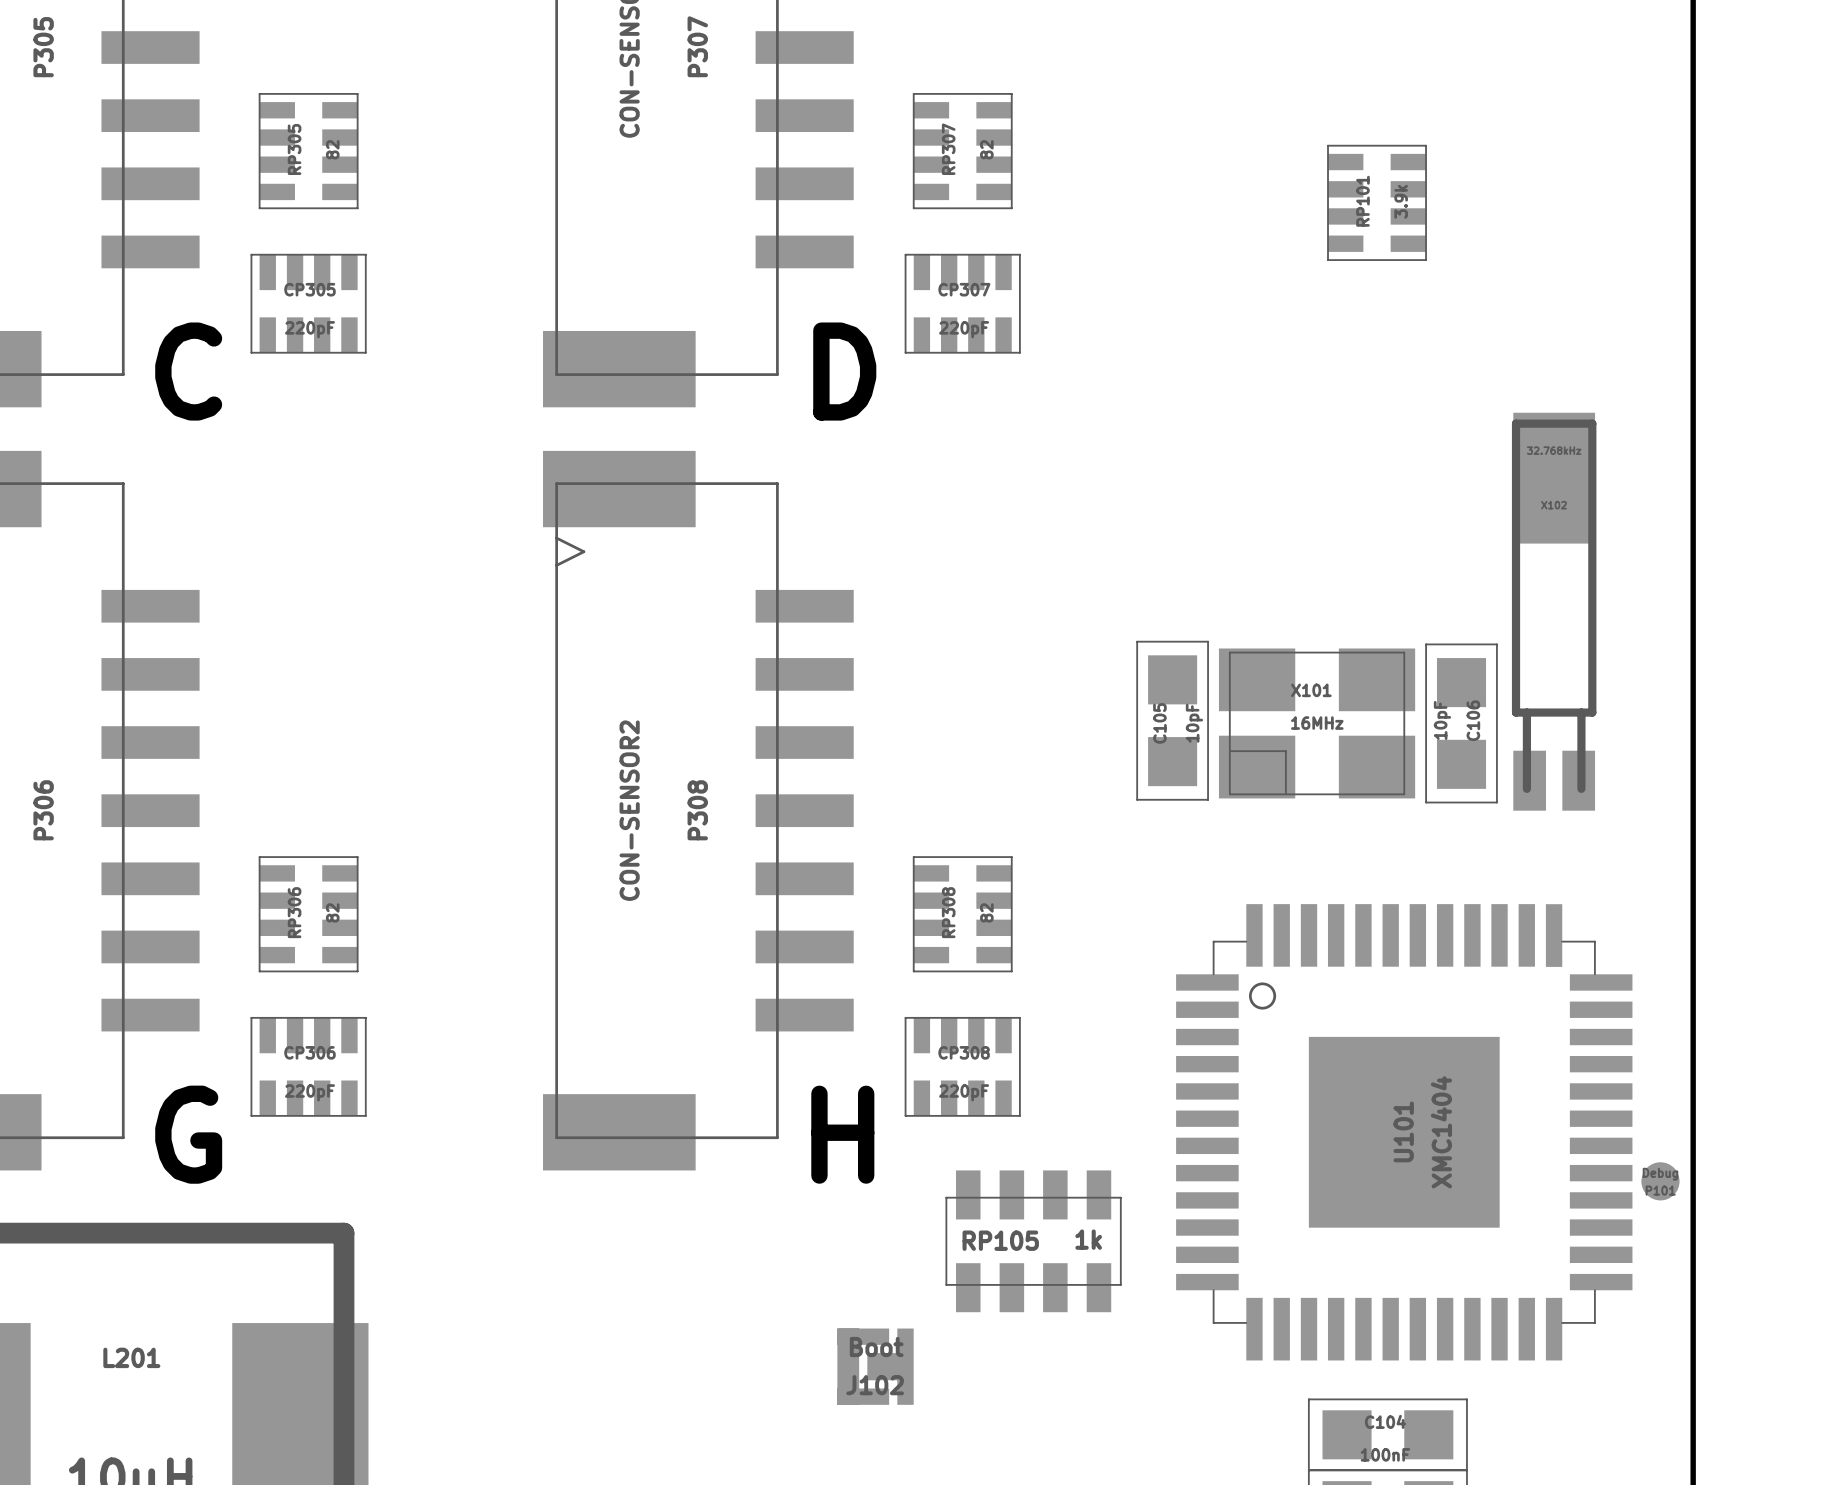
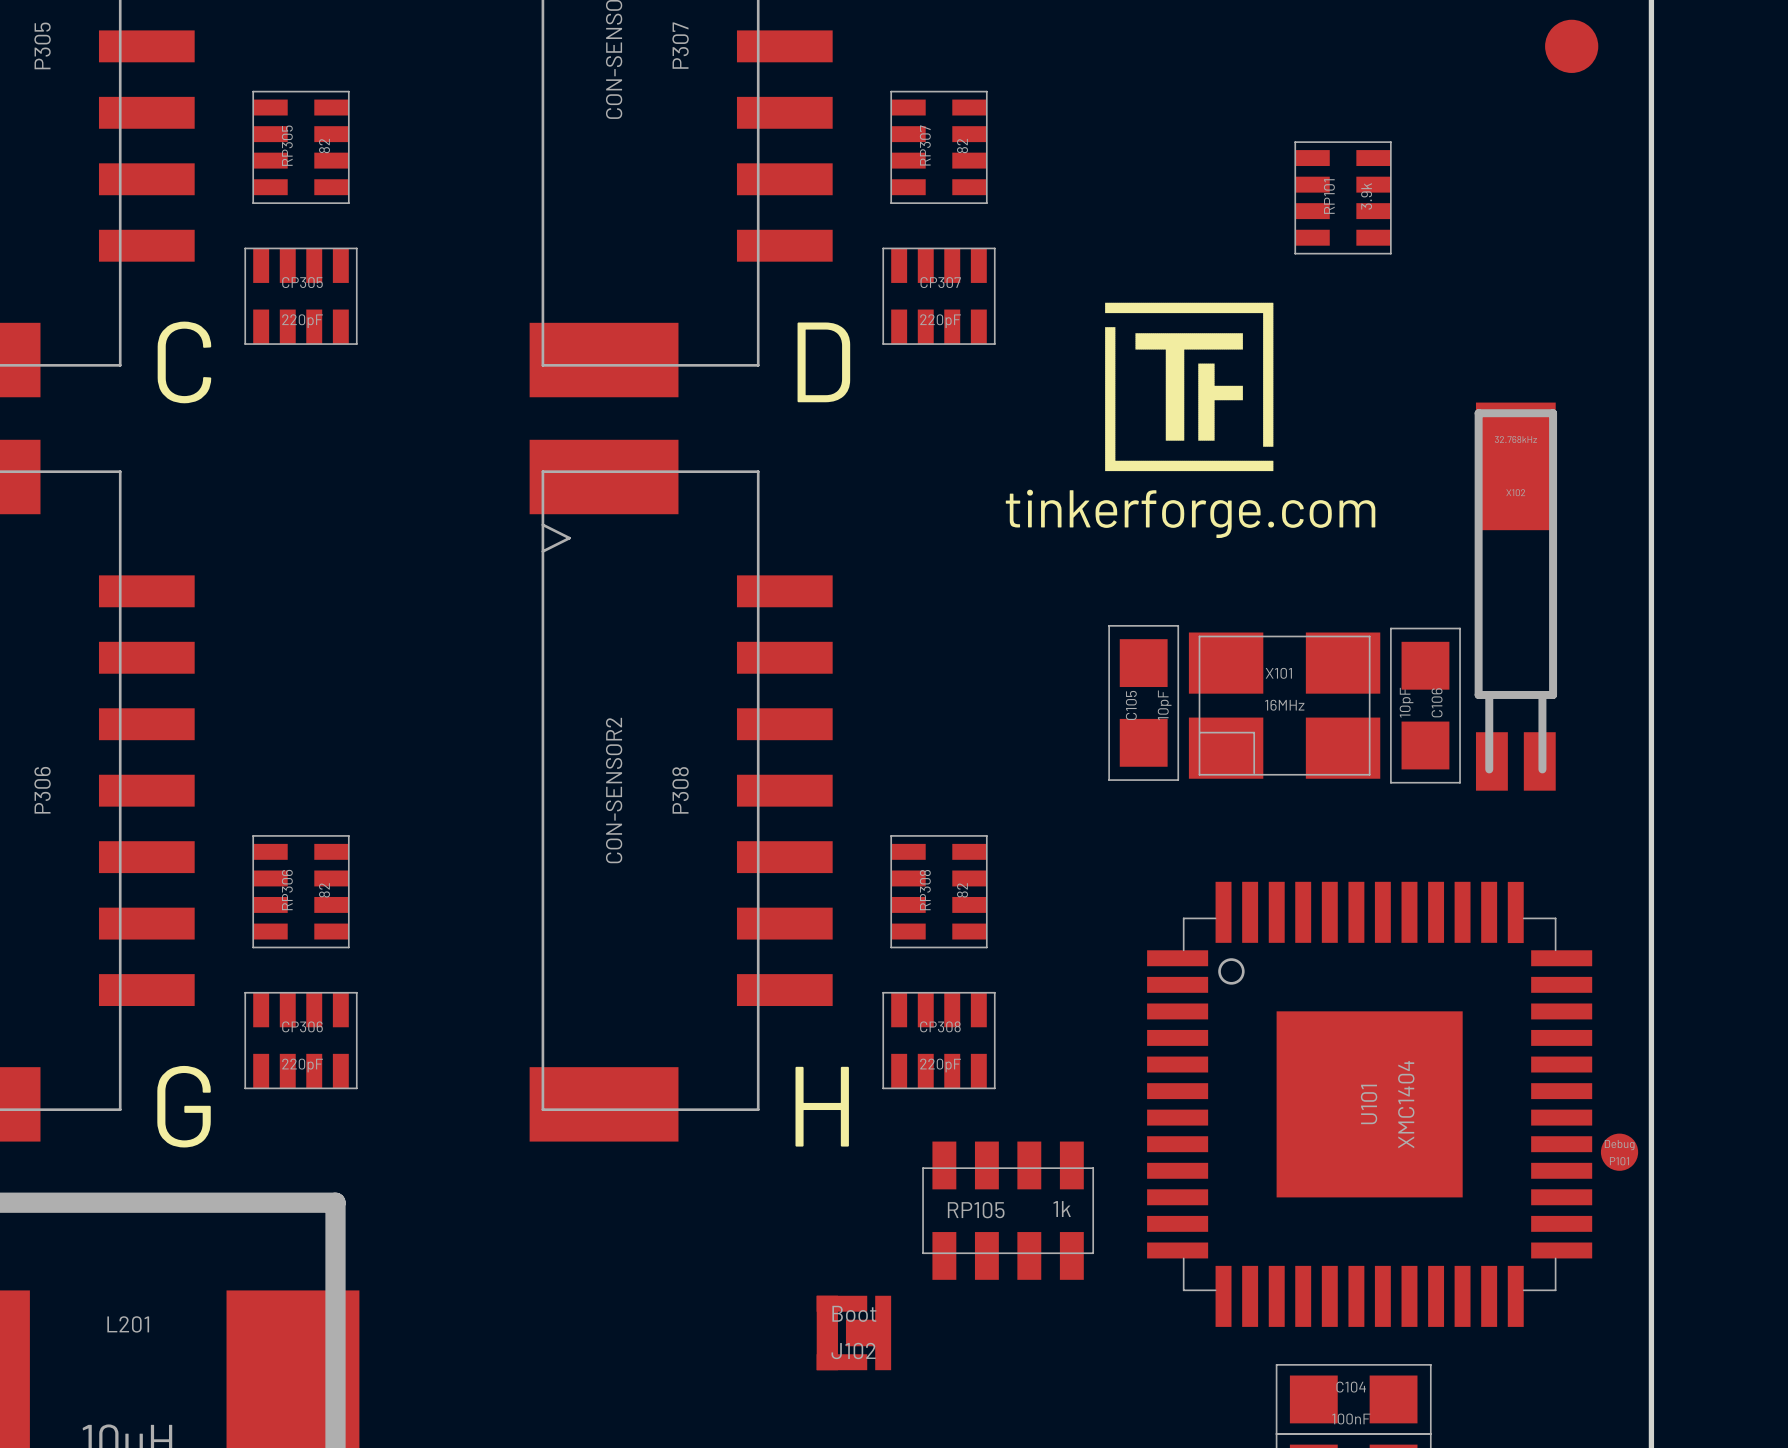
part: none -> (1571, 46)
drawing: none -> [1105, 302, 1274, 472]
text: none -> tinkerforge.com (1190, 513)

